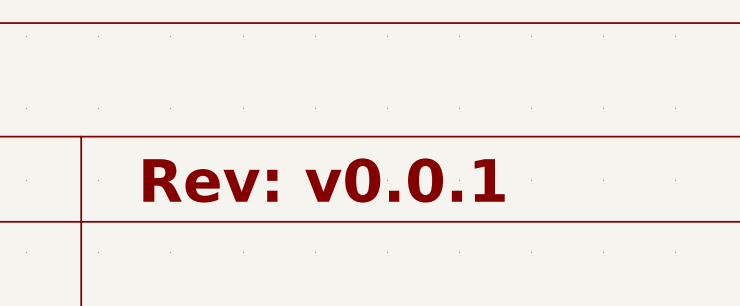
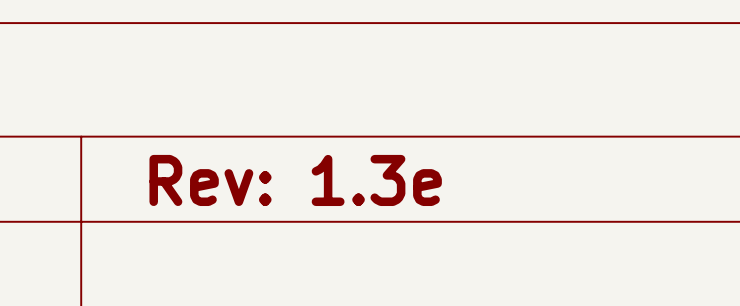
title block: Rev: v0.0.1 (324, 180) -> Rev: 1.3e (295, 180)

